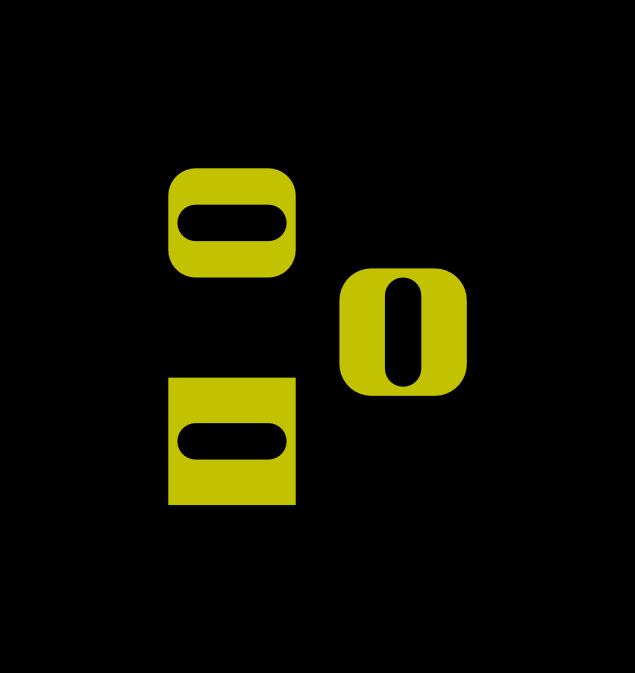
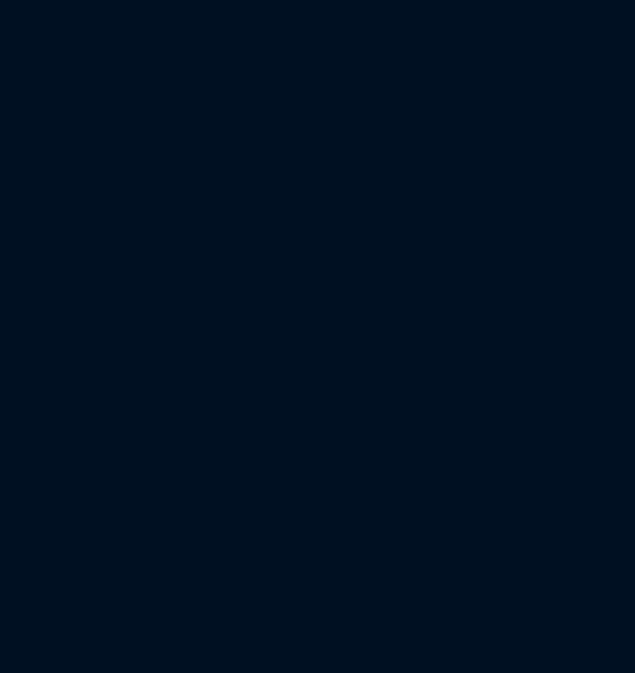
part: (317, 336) -> none

